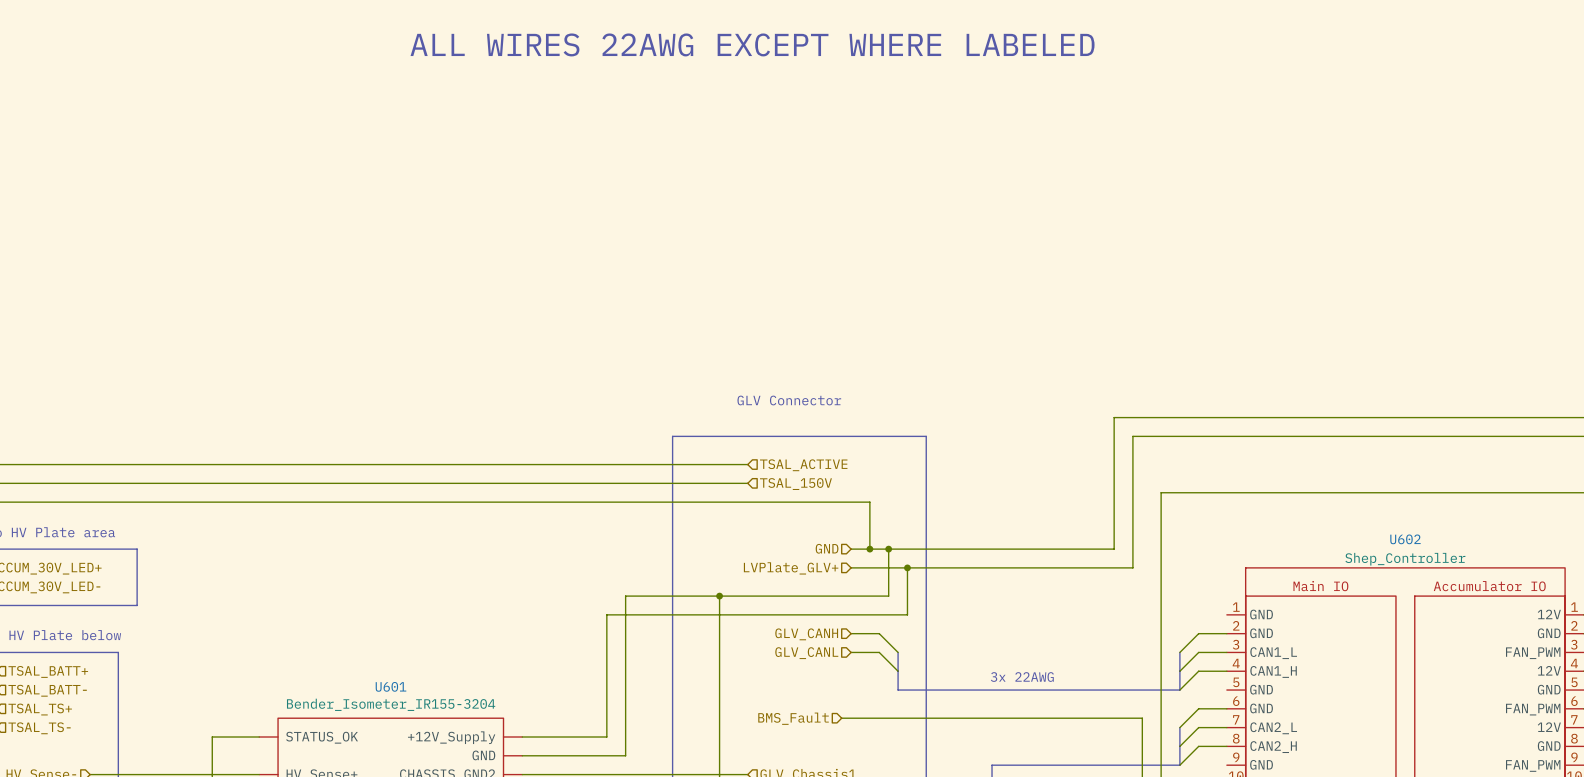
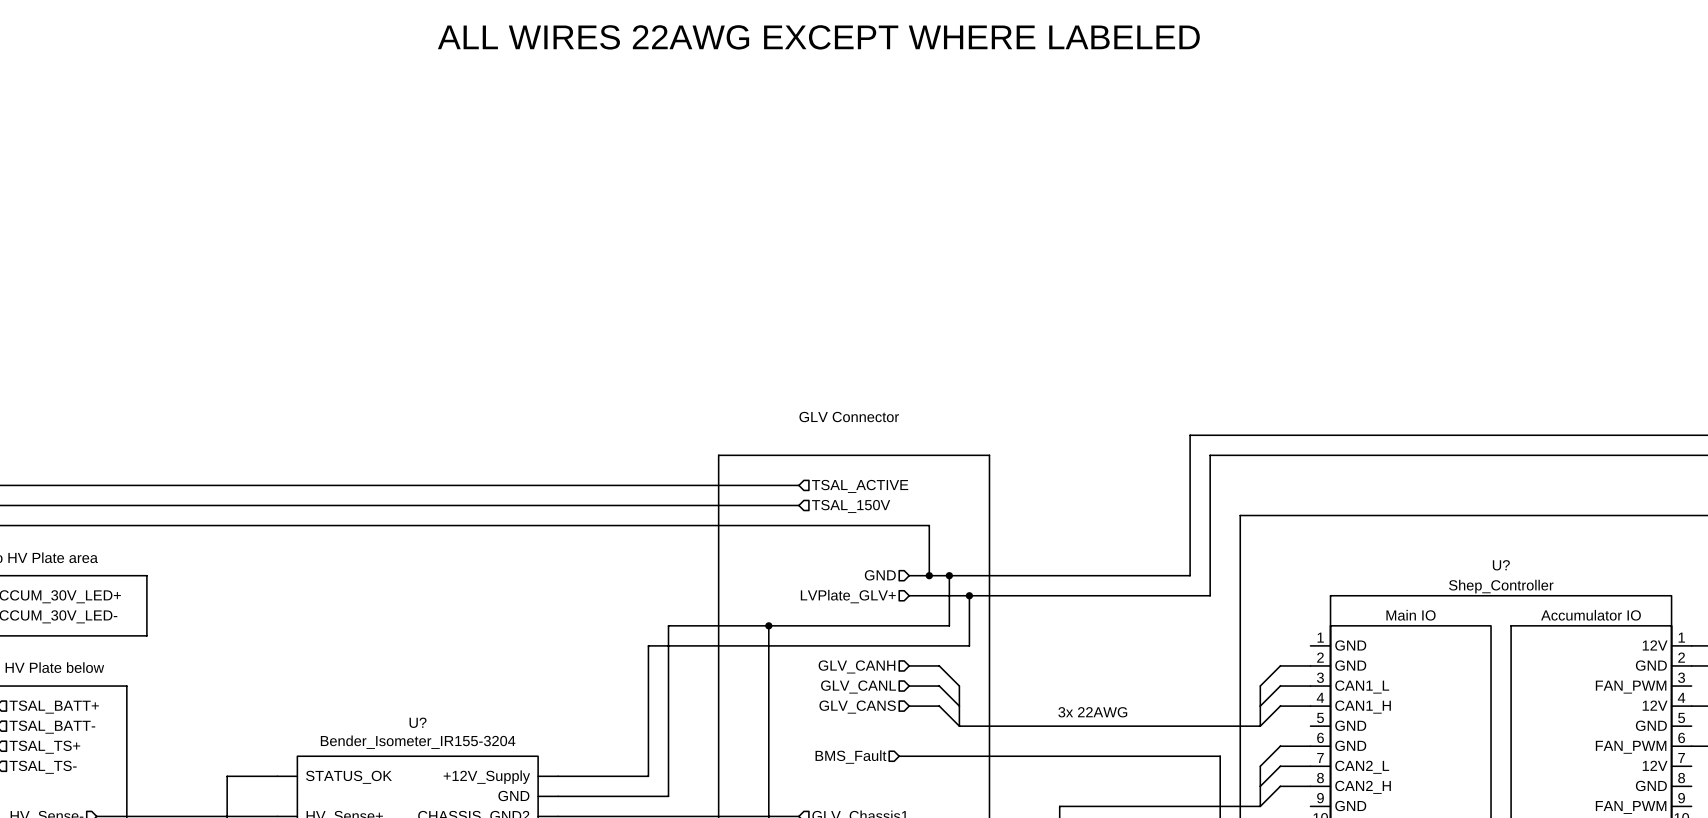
U602 name: U602 (1405, 539) -> U? (1501, 565)
hierarchical label: none -> GLV_CANS (857, 707)
wire: none -> (909, 706) (939, 706) (959, 726)
U601 name: U601 (390, 686) -> U? (418, 722)

